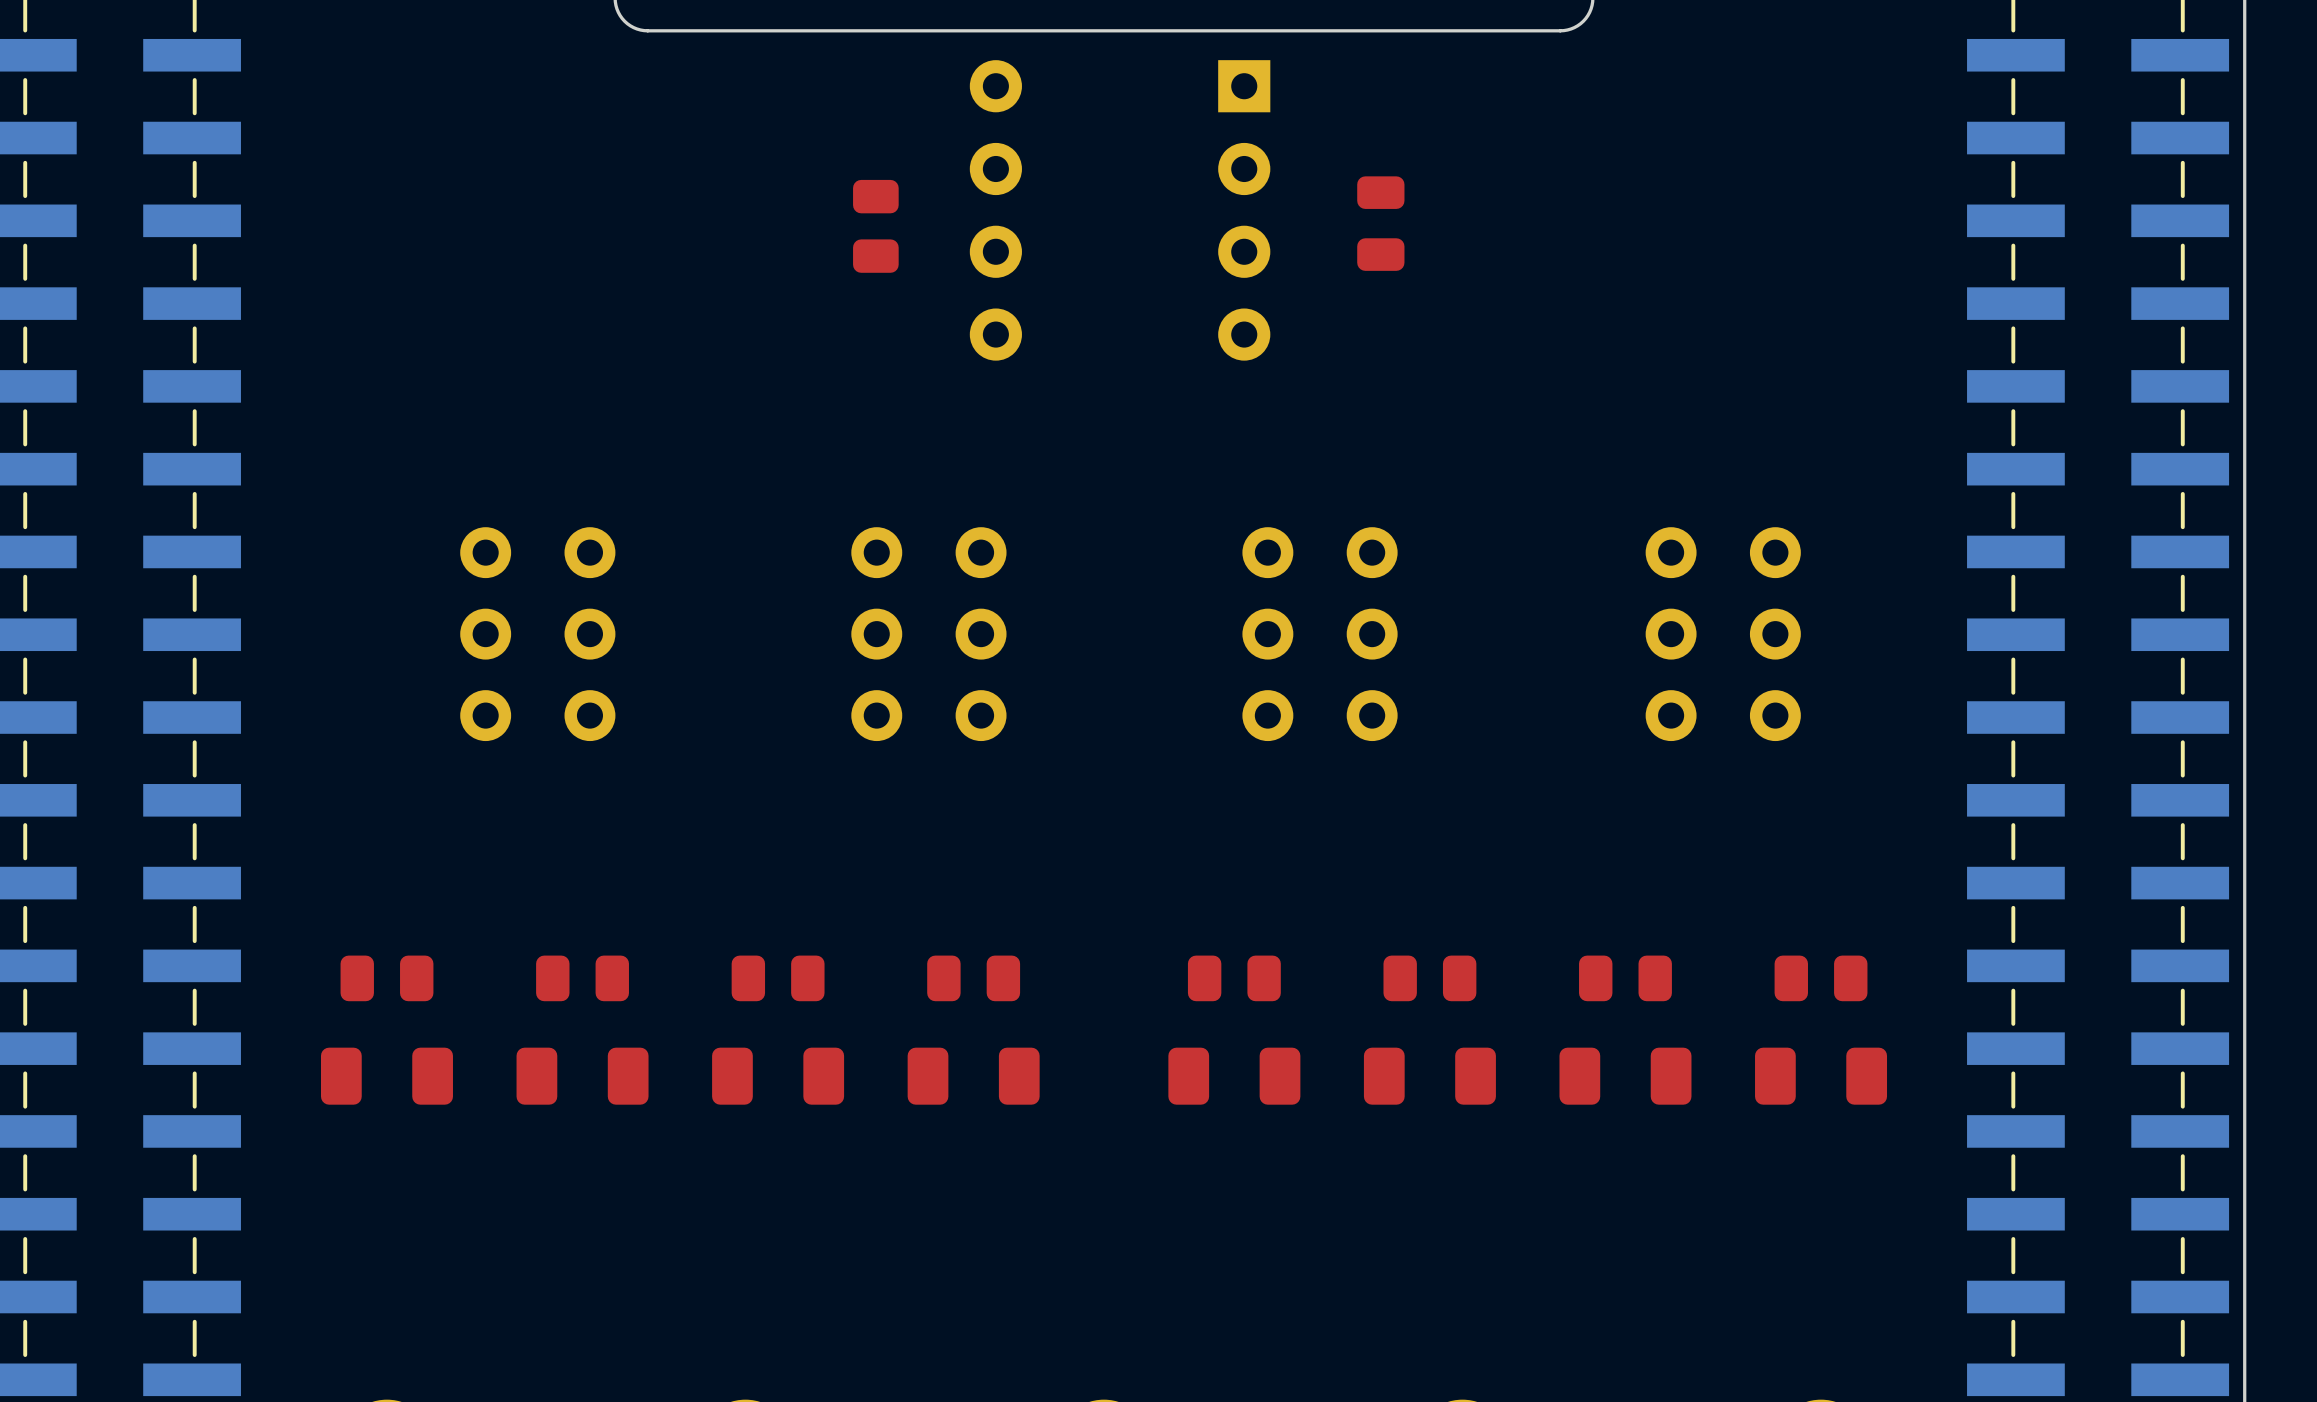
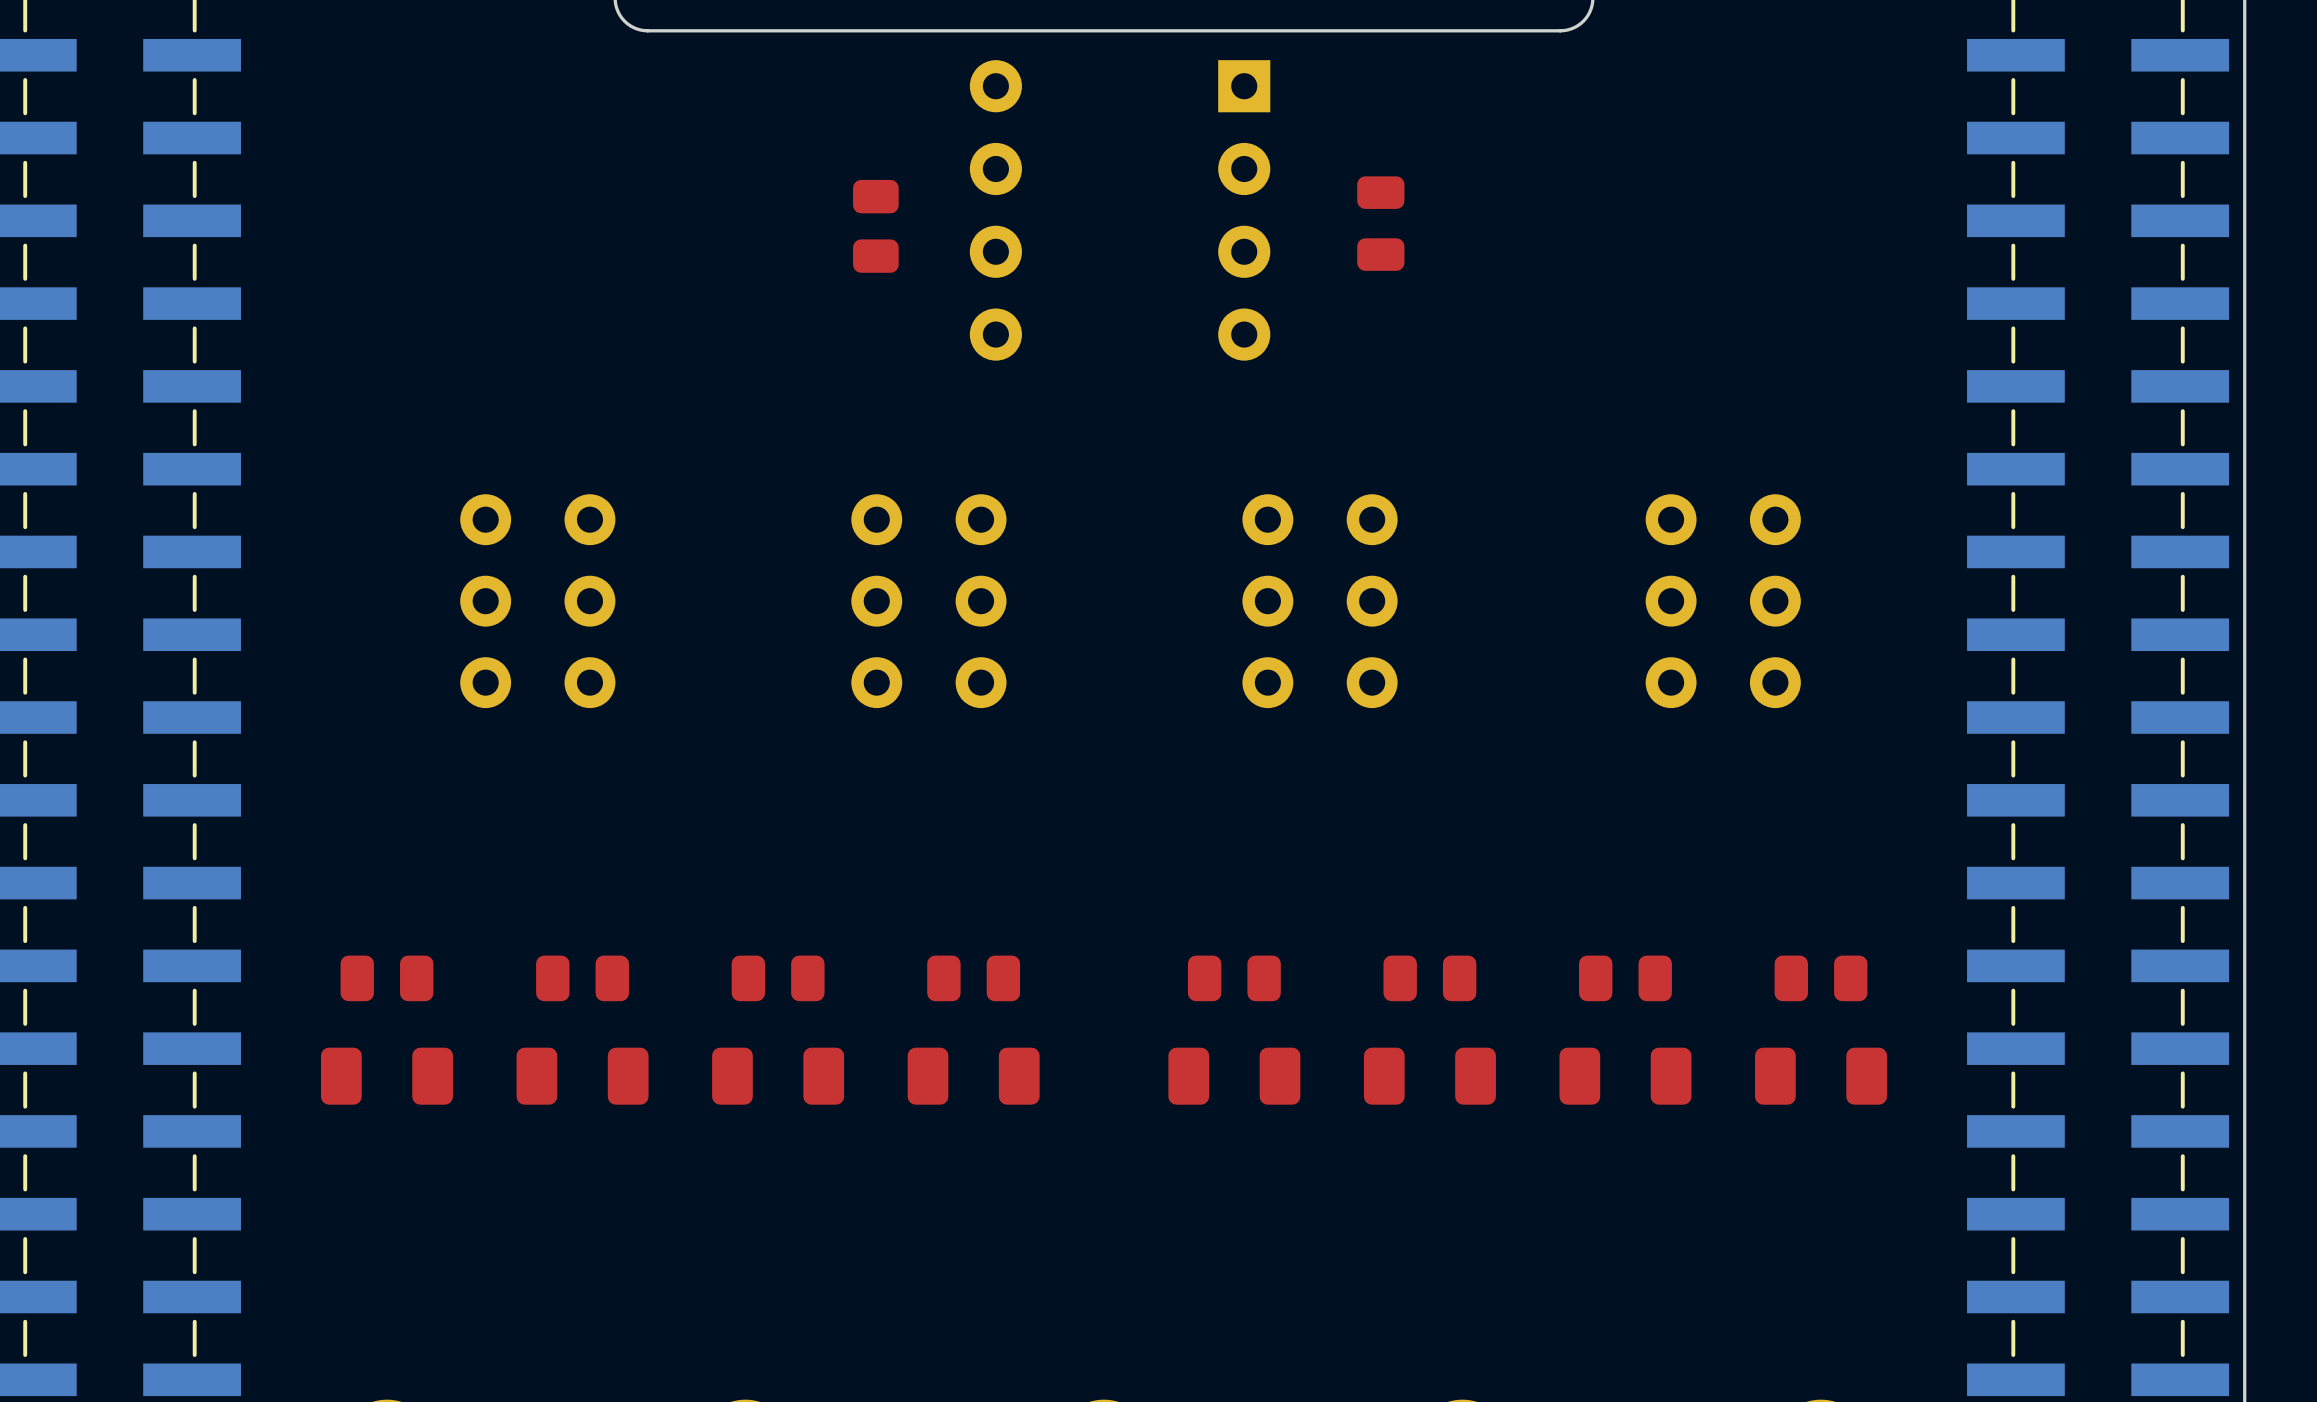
part position: (537, 634) -> (537, 601)
part position: (928, 634) -> (928, 601)
part position: (1320, 634) -> (1320, 601)
part position: (1723, 634) -> (1723, 601)

